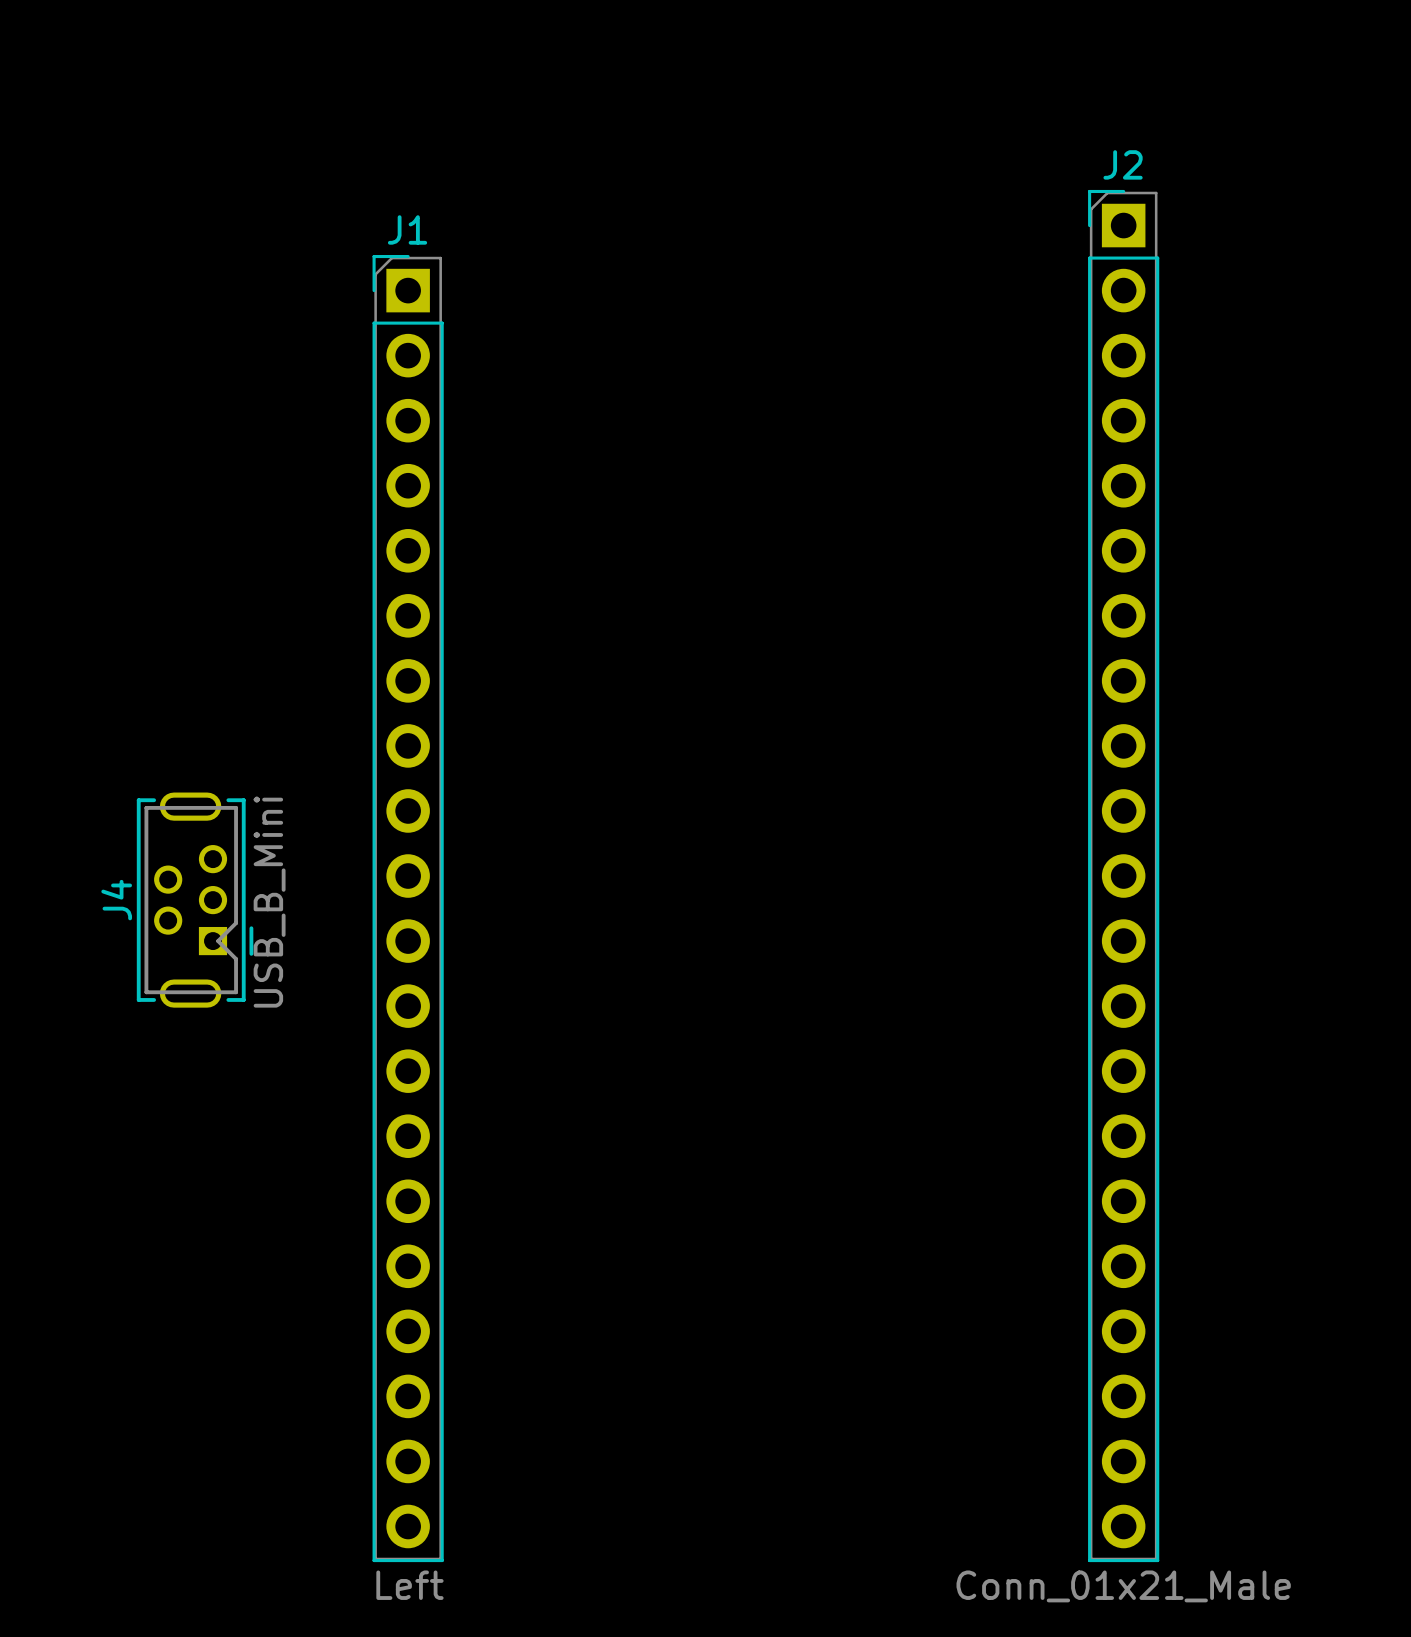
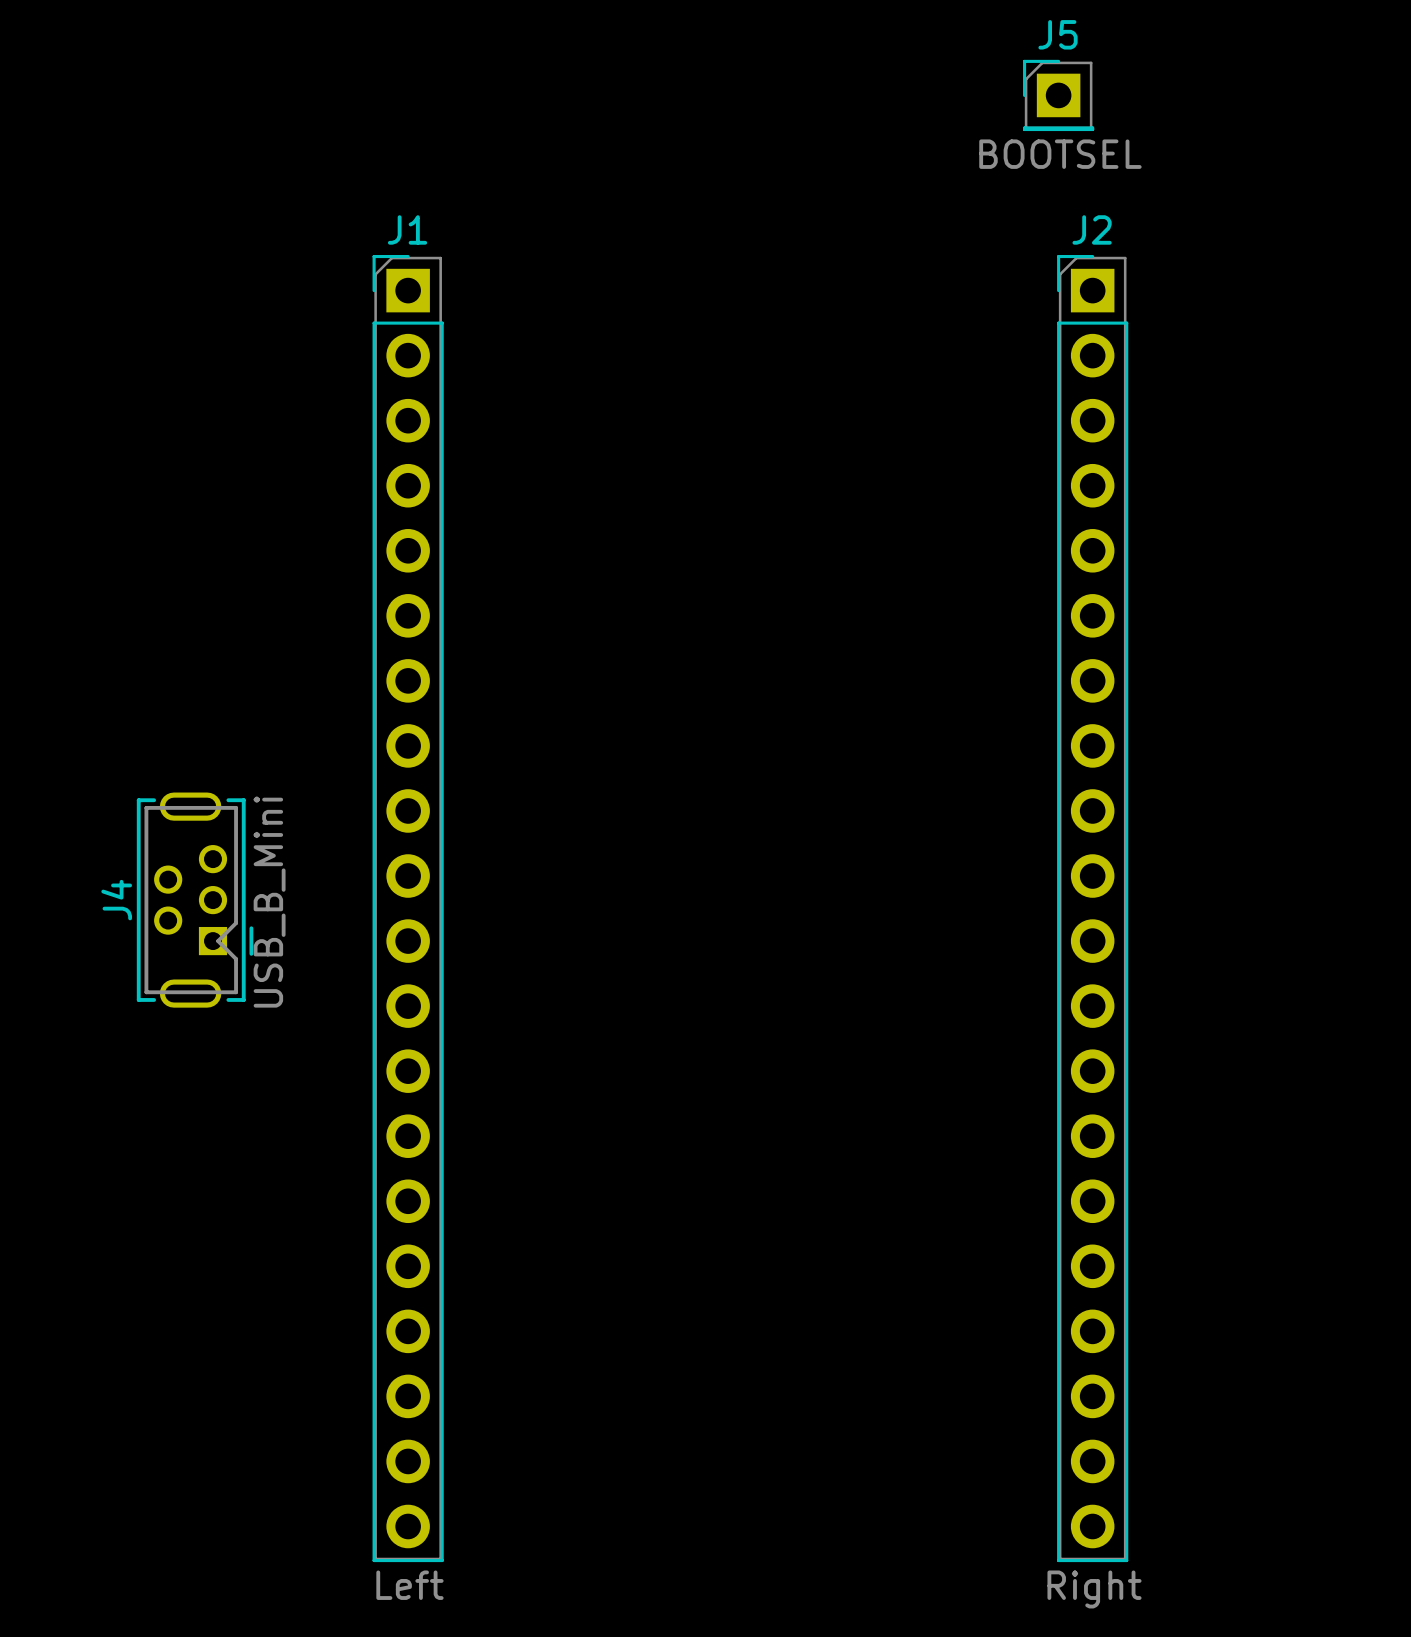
J5: none -> BOOTSEL (1058, 95)
J2 footprint: [1088, 189, 1160, 1563] -> [1057, 254, 1129, 1563]
J2 value: Conn_01x21_Male (1123, 1586) -> Right (1094, 1589)

